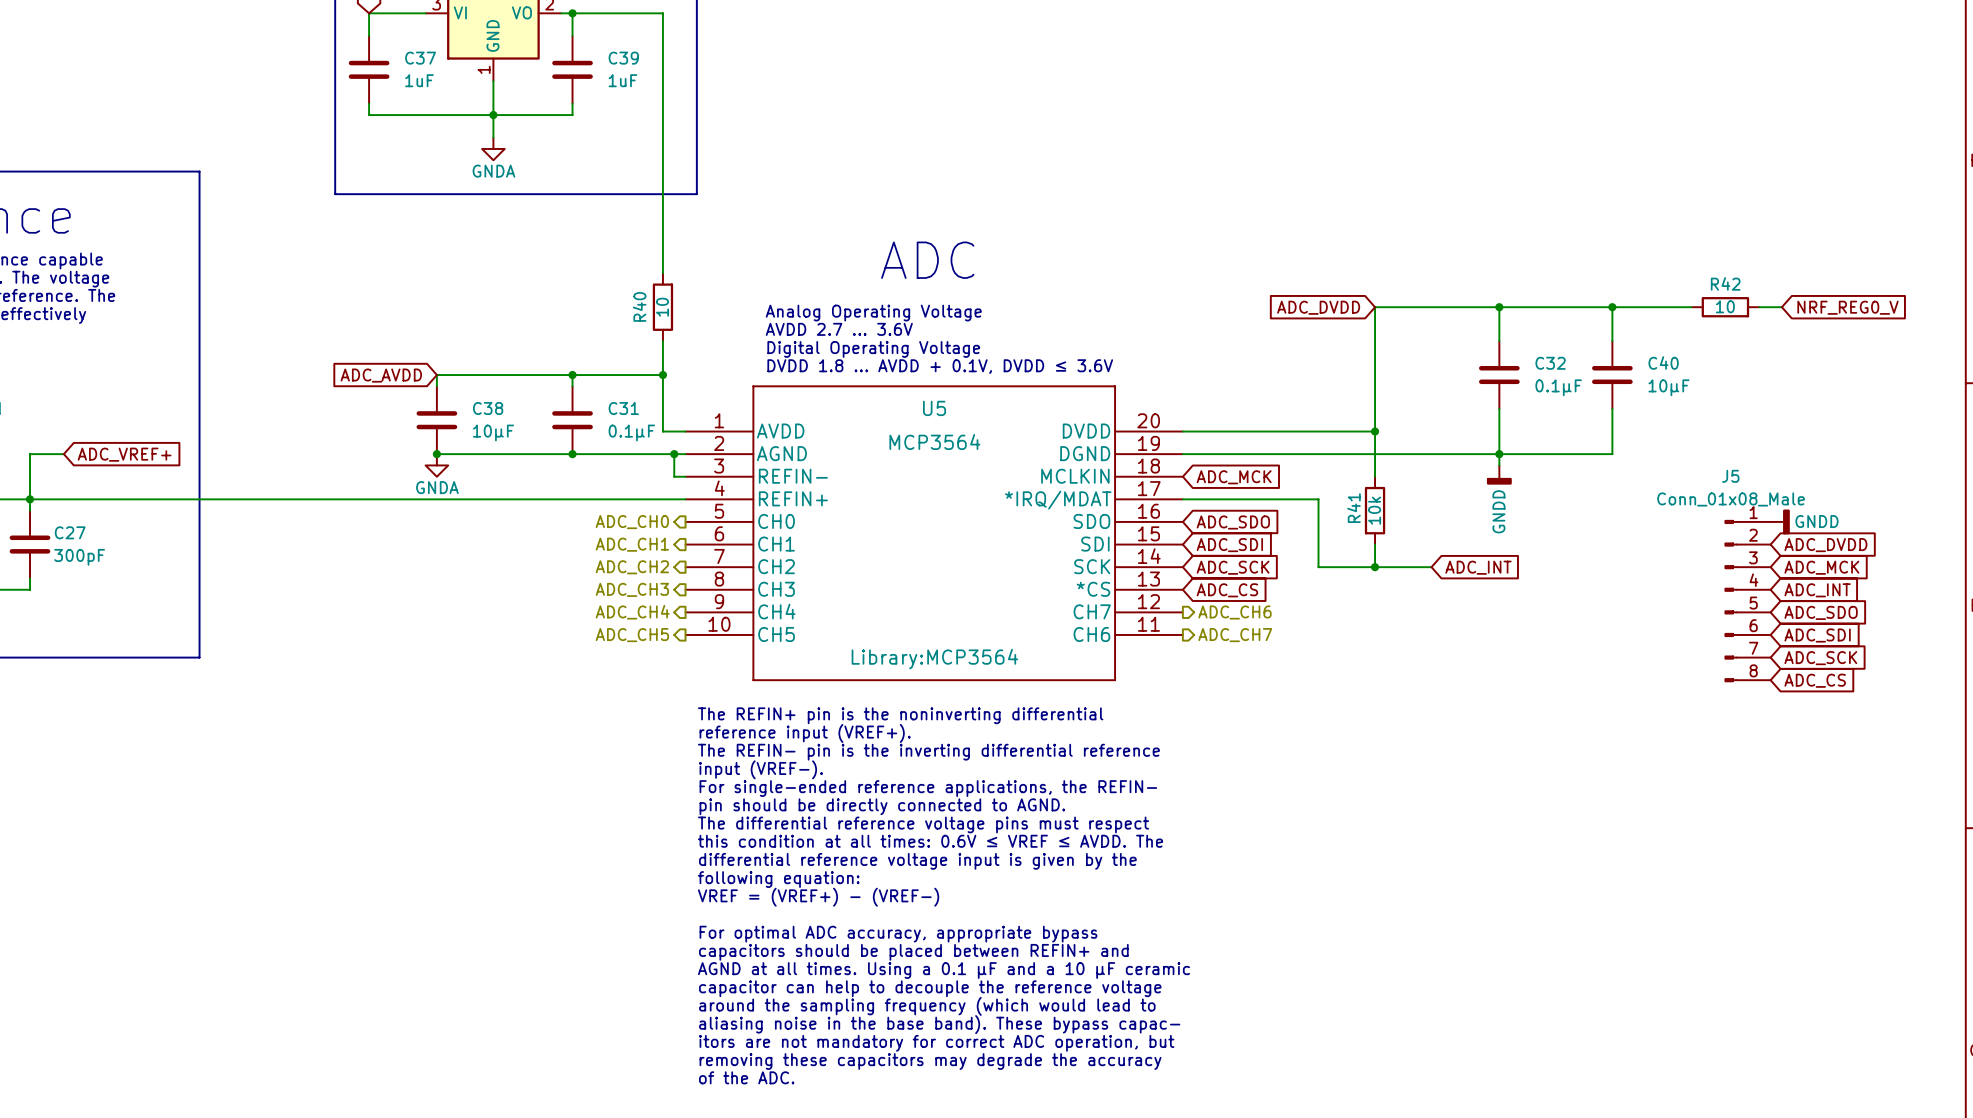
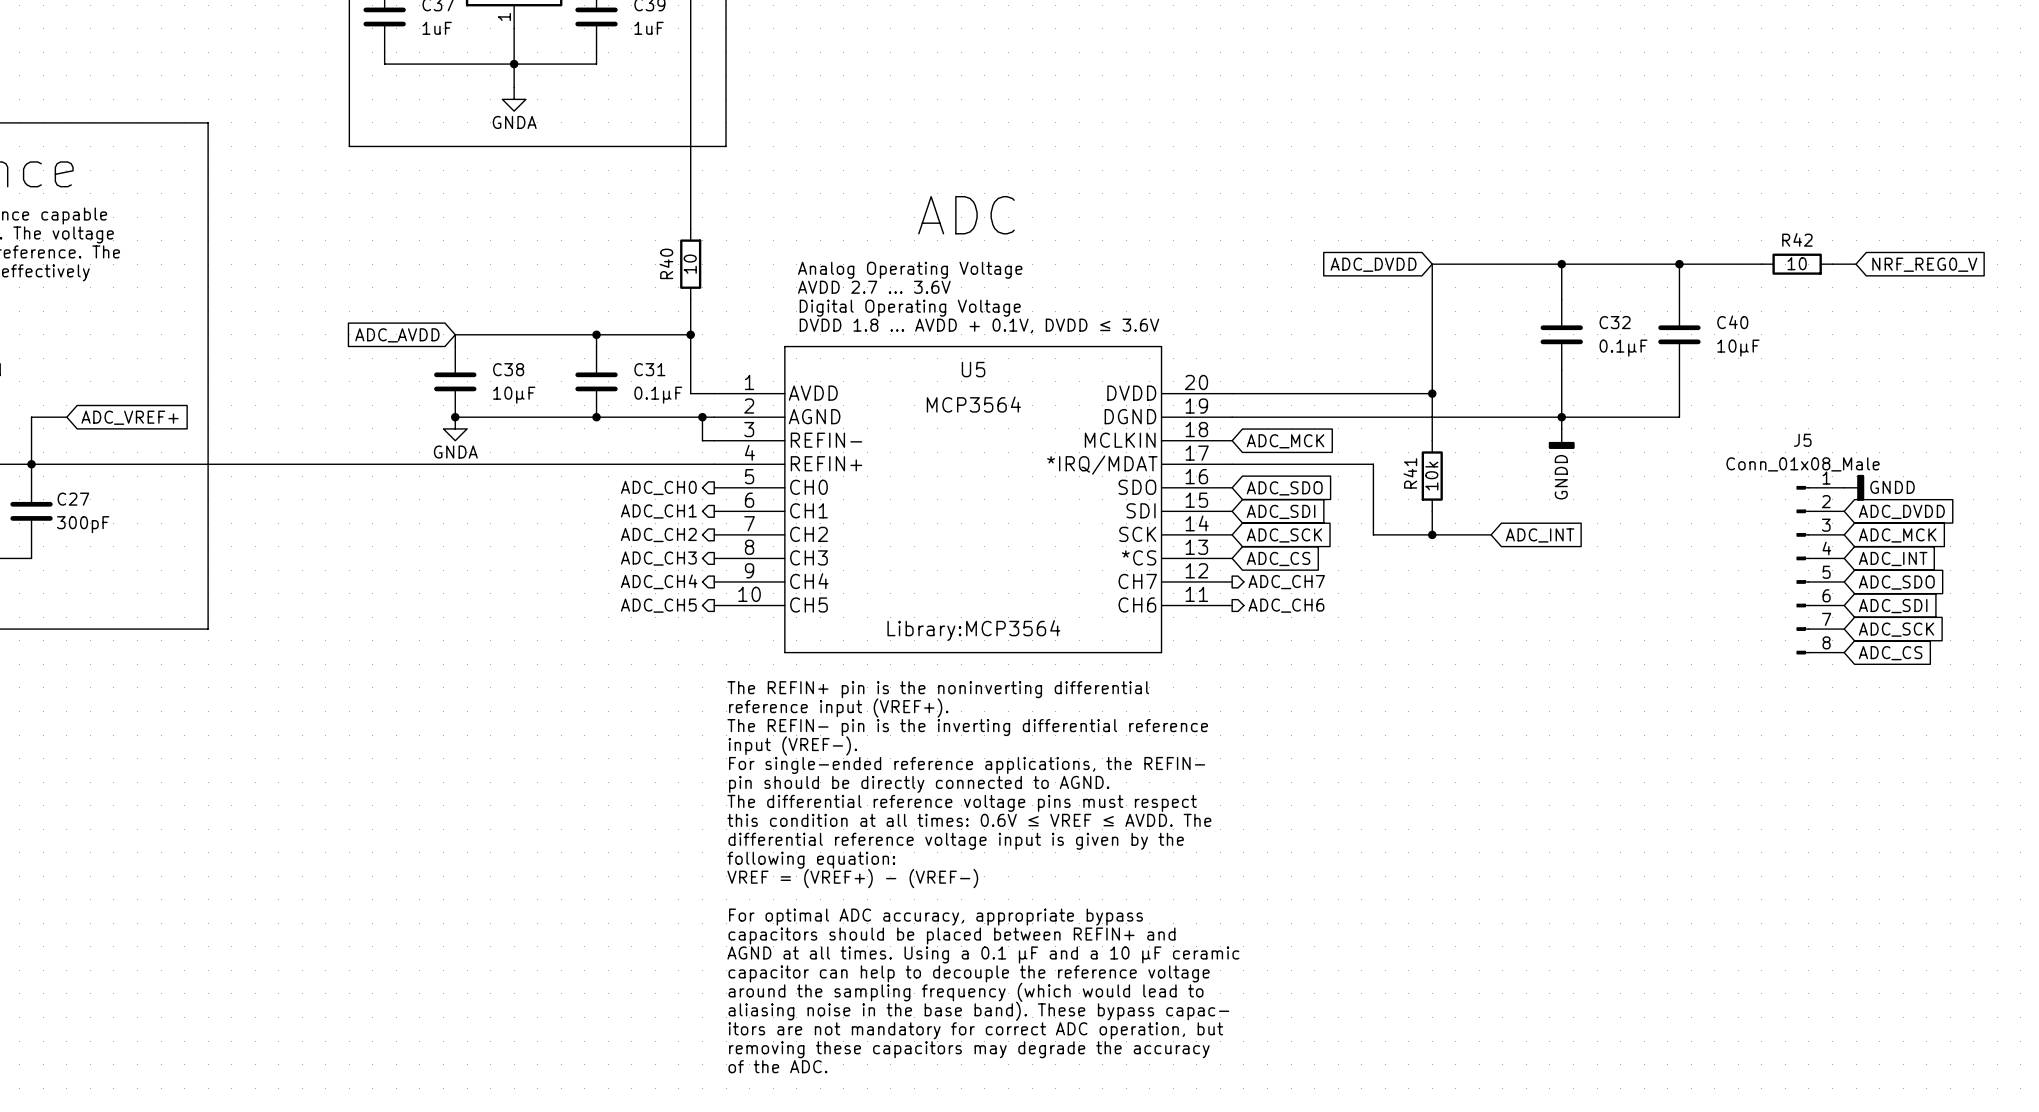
hierarchical label: ADC_CH6 (1234, 612) -> ADC_CH7 (1286, 582)
hierarchical label: ADC_CH7 (1235, 635) -> ADC_CH6 (1286, 605)

